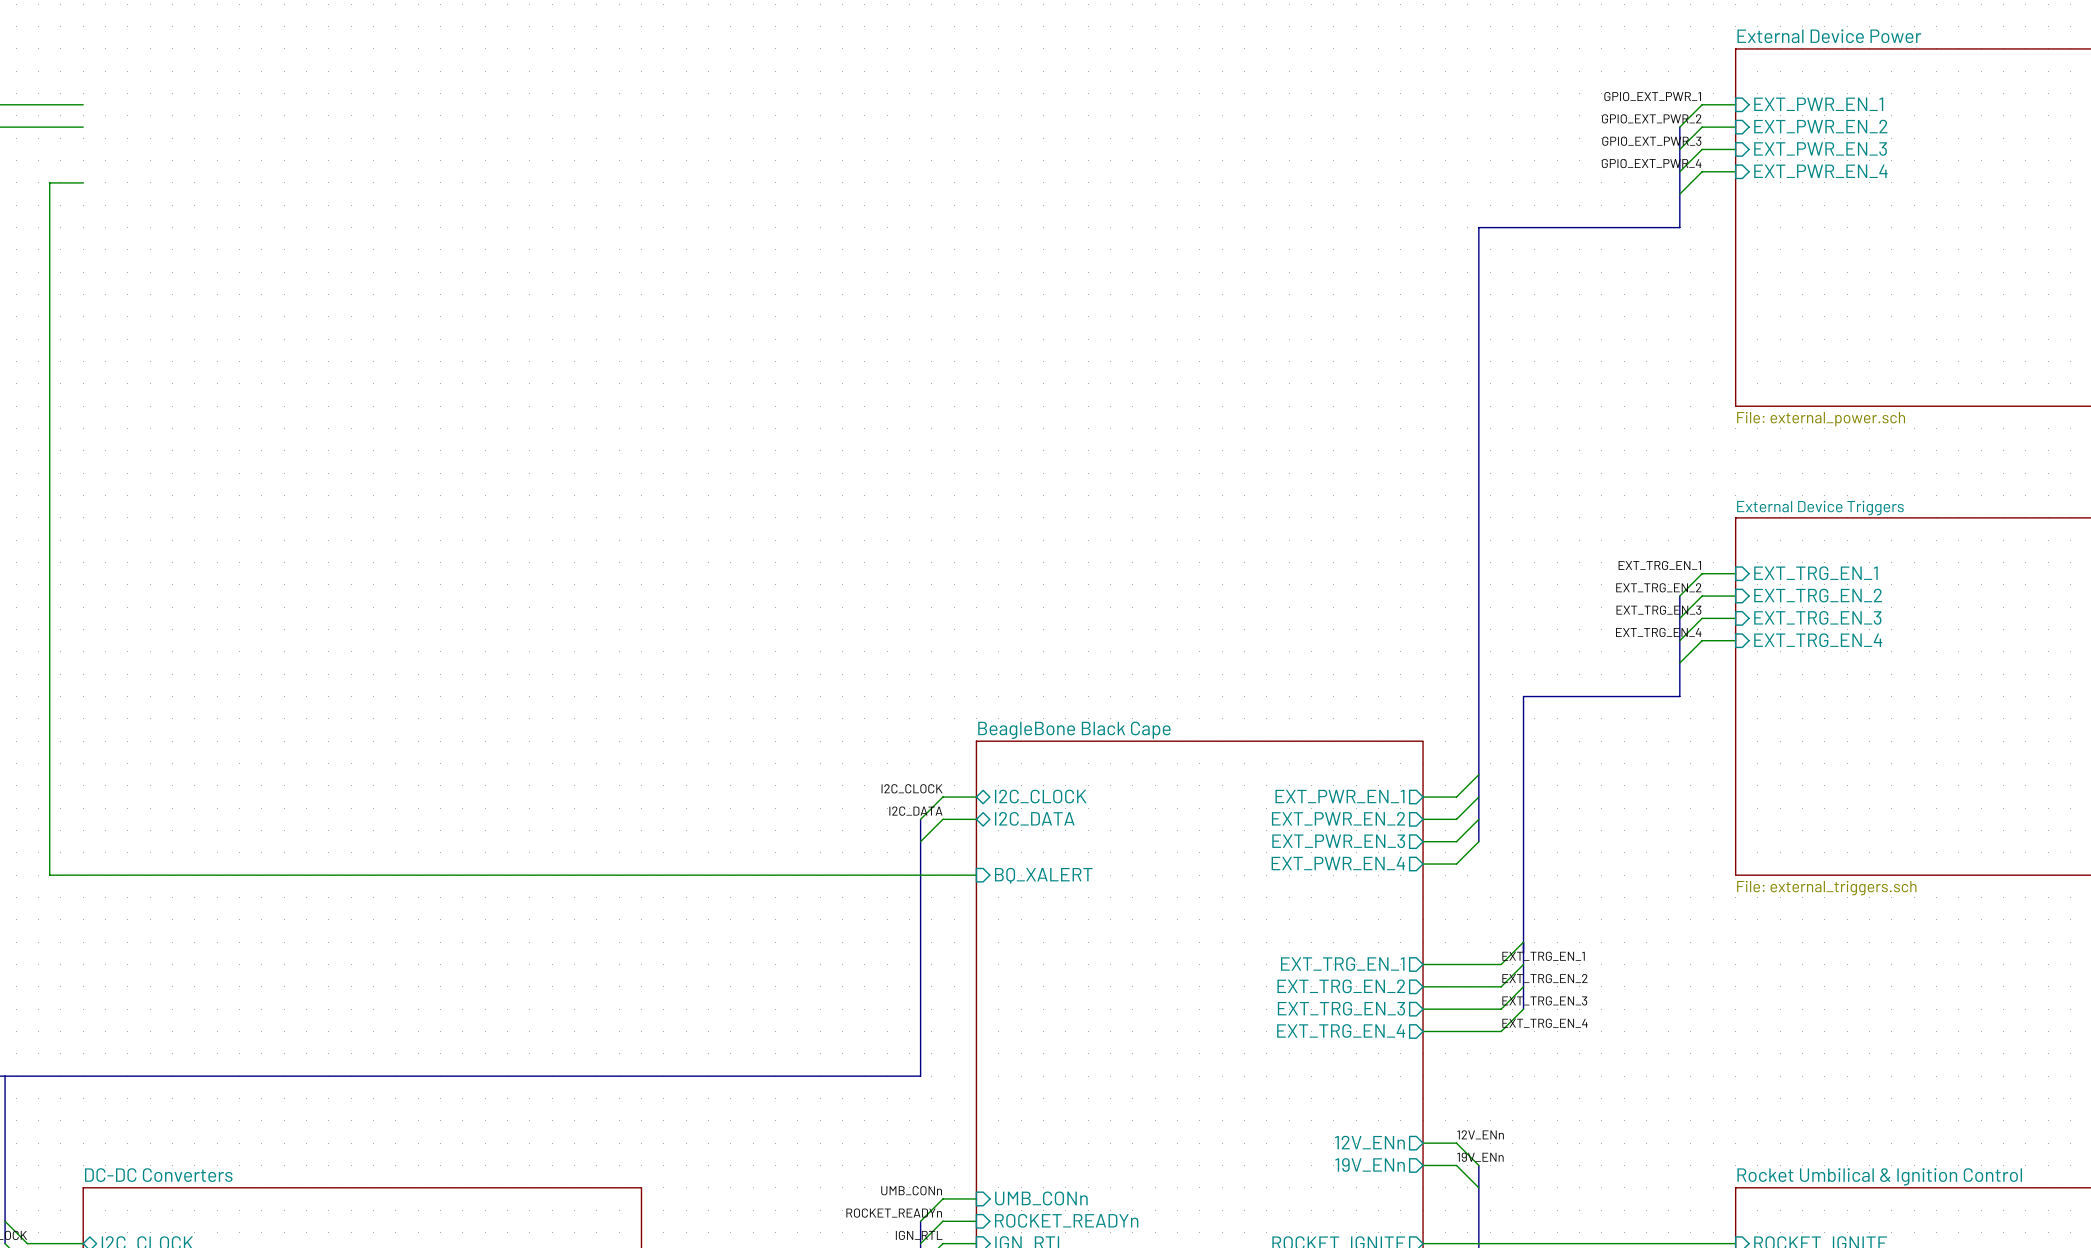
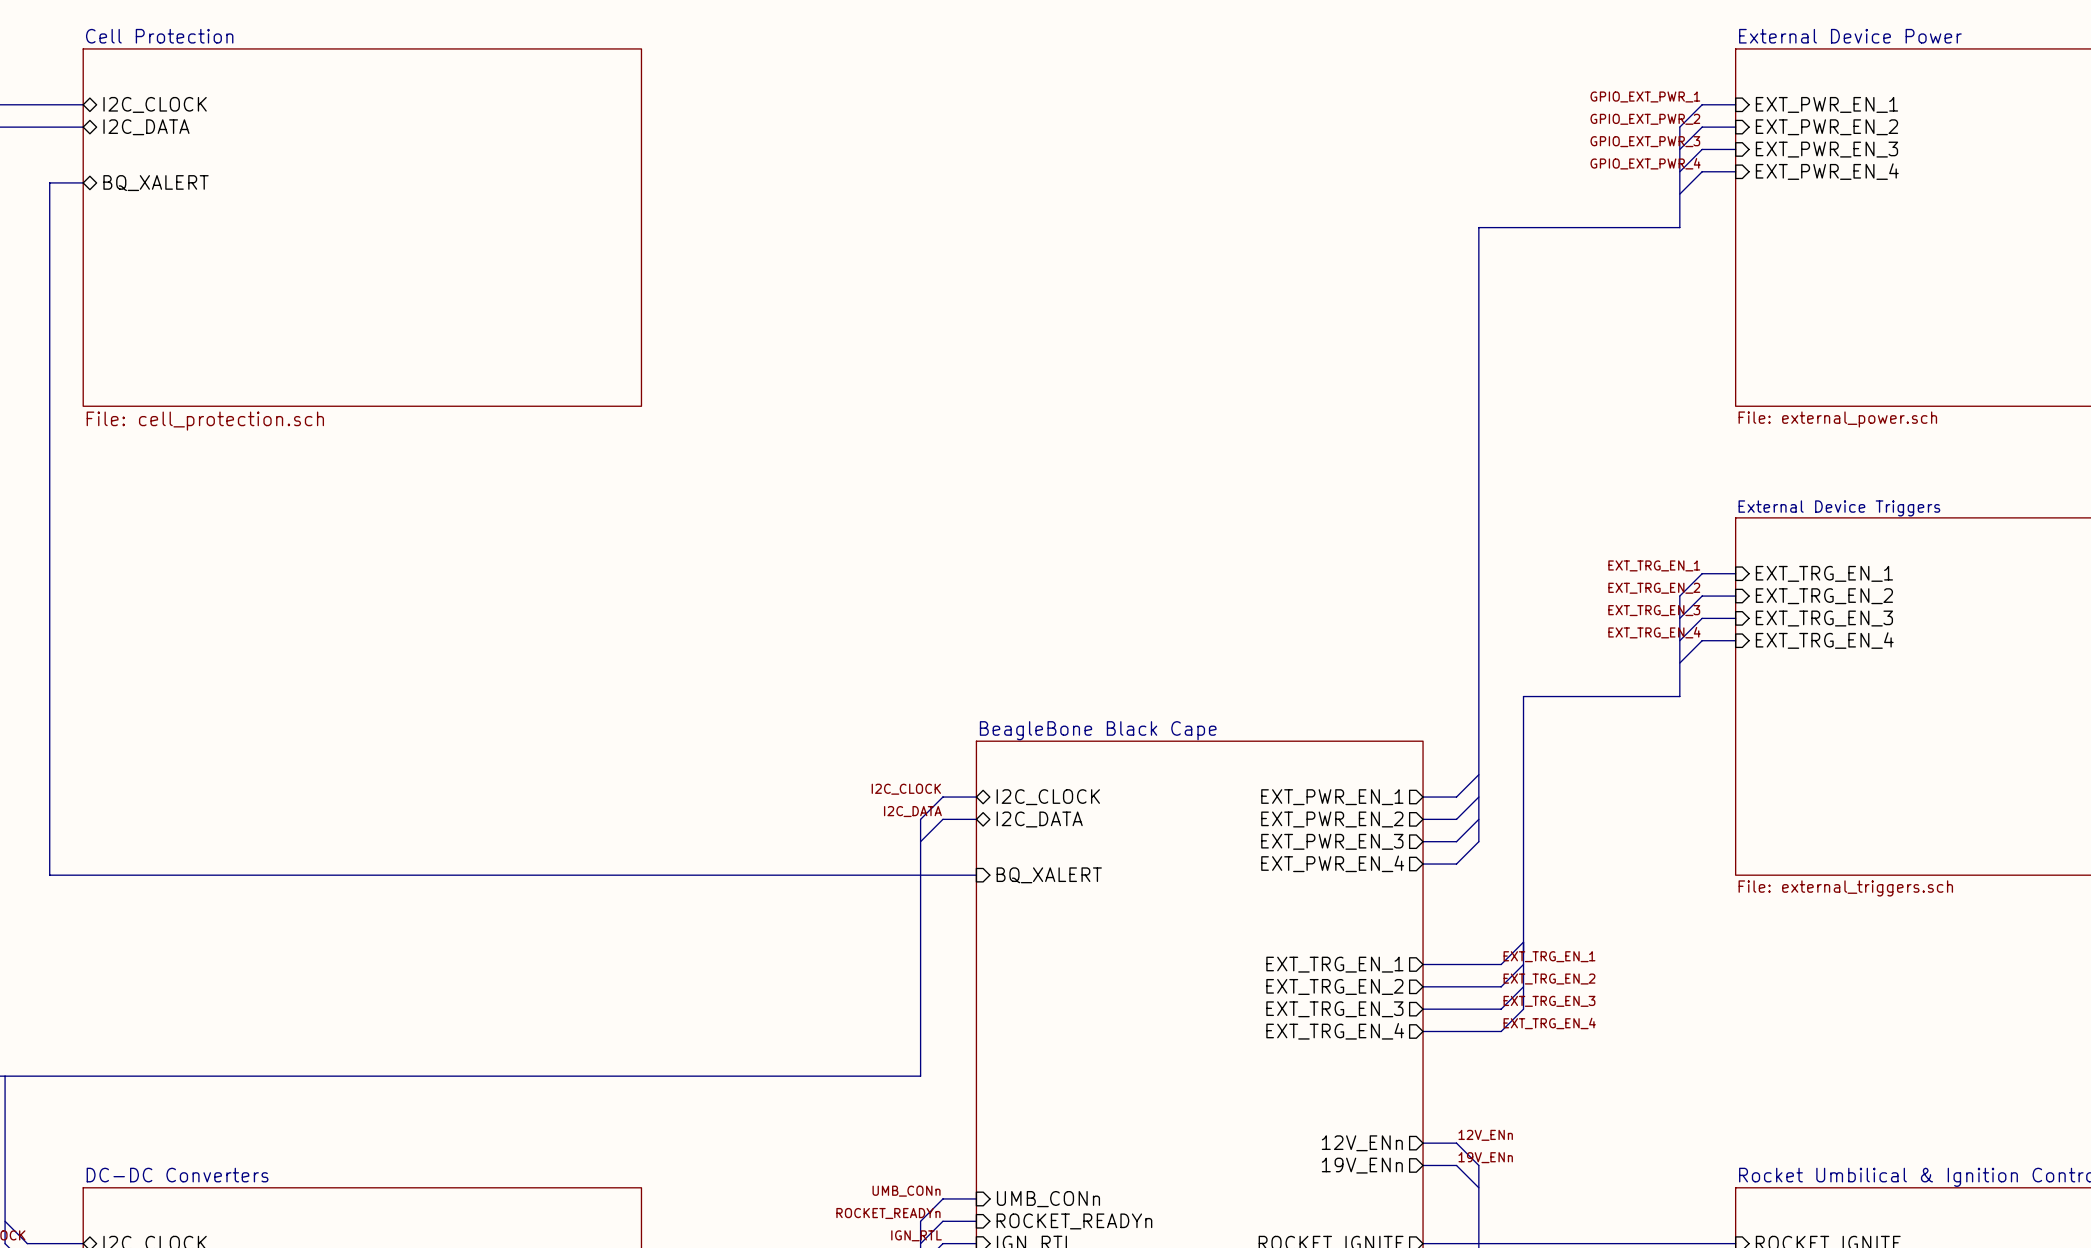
sheet pin: none -> I2C_CLOCK (155, 104)
sheet pin: none -> I2C_DATA (146, 127)
sheet pin: none -> BQ_XALERT (156, 183)
sheet Cell Protection: none -> File: cell_protection.sch (362, 227)

